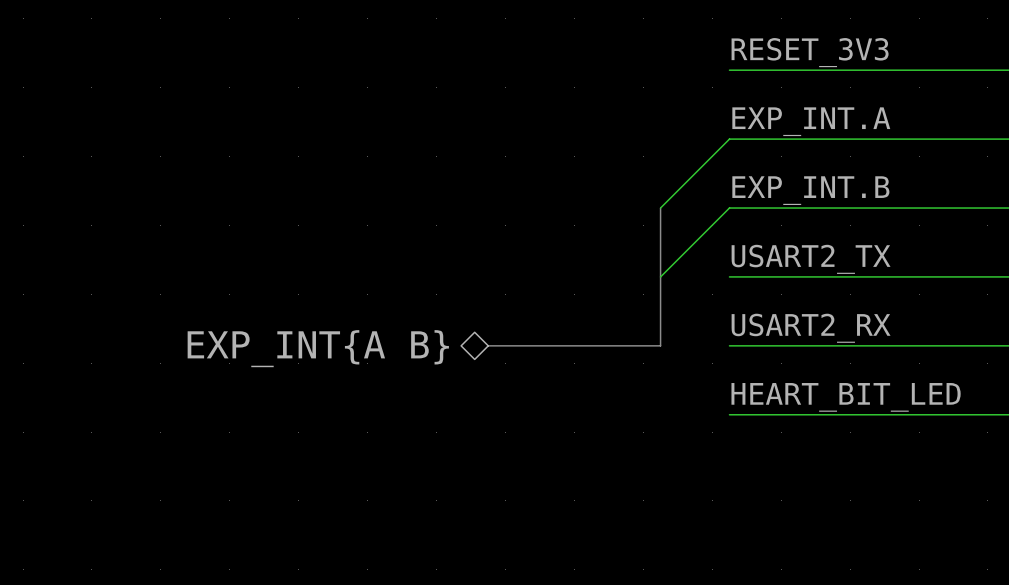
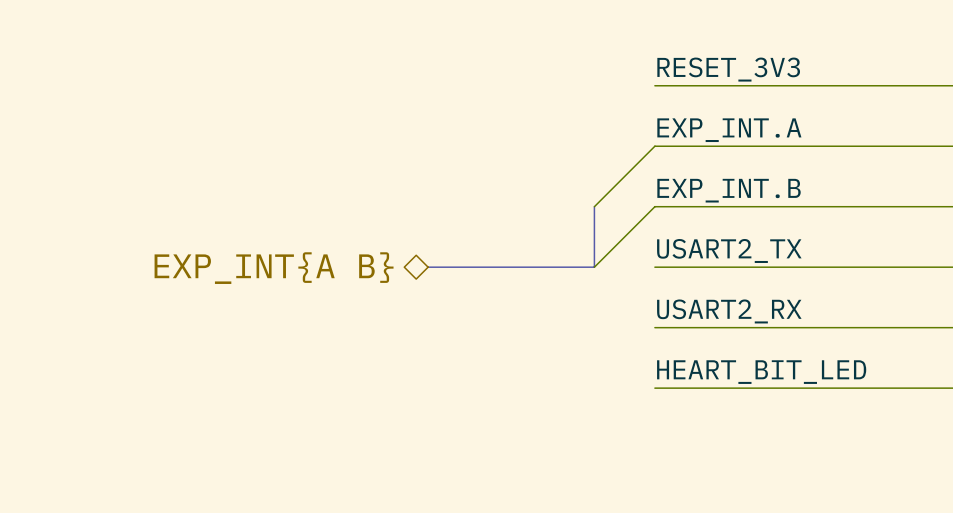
bus: (660, 276) (660, 345) (488, 345) -> (594, 267) (428, 267)
hierarchical label position: EXP_INT{A B} (318, 348) -> EXP_INT{A B} (274, 268)

